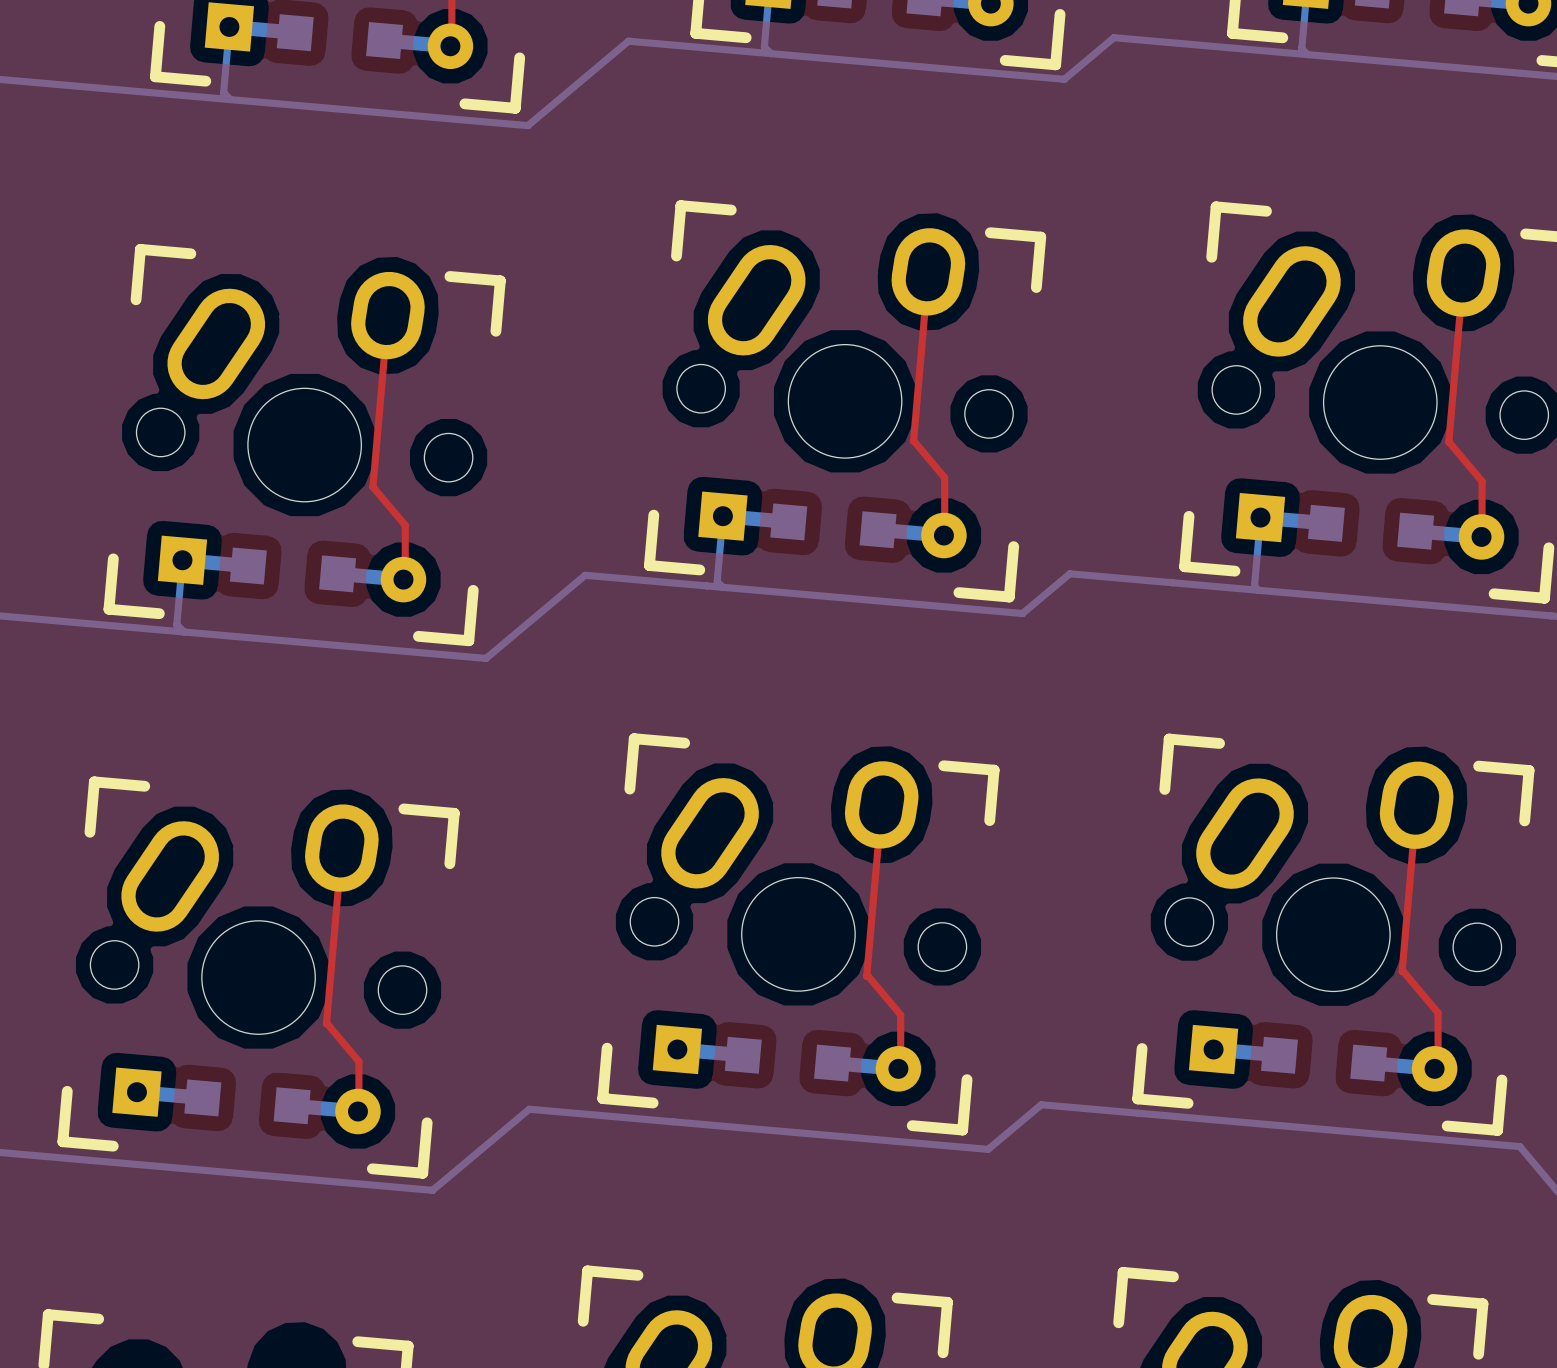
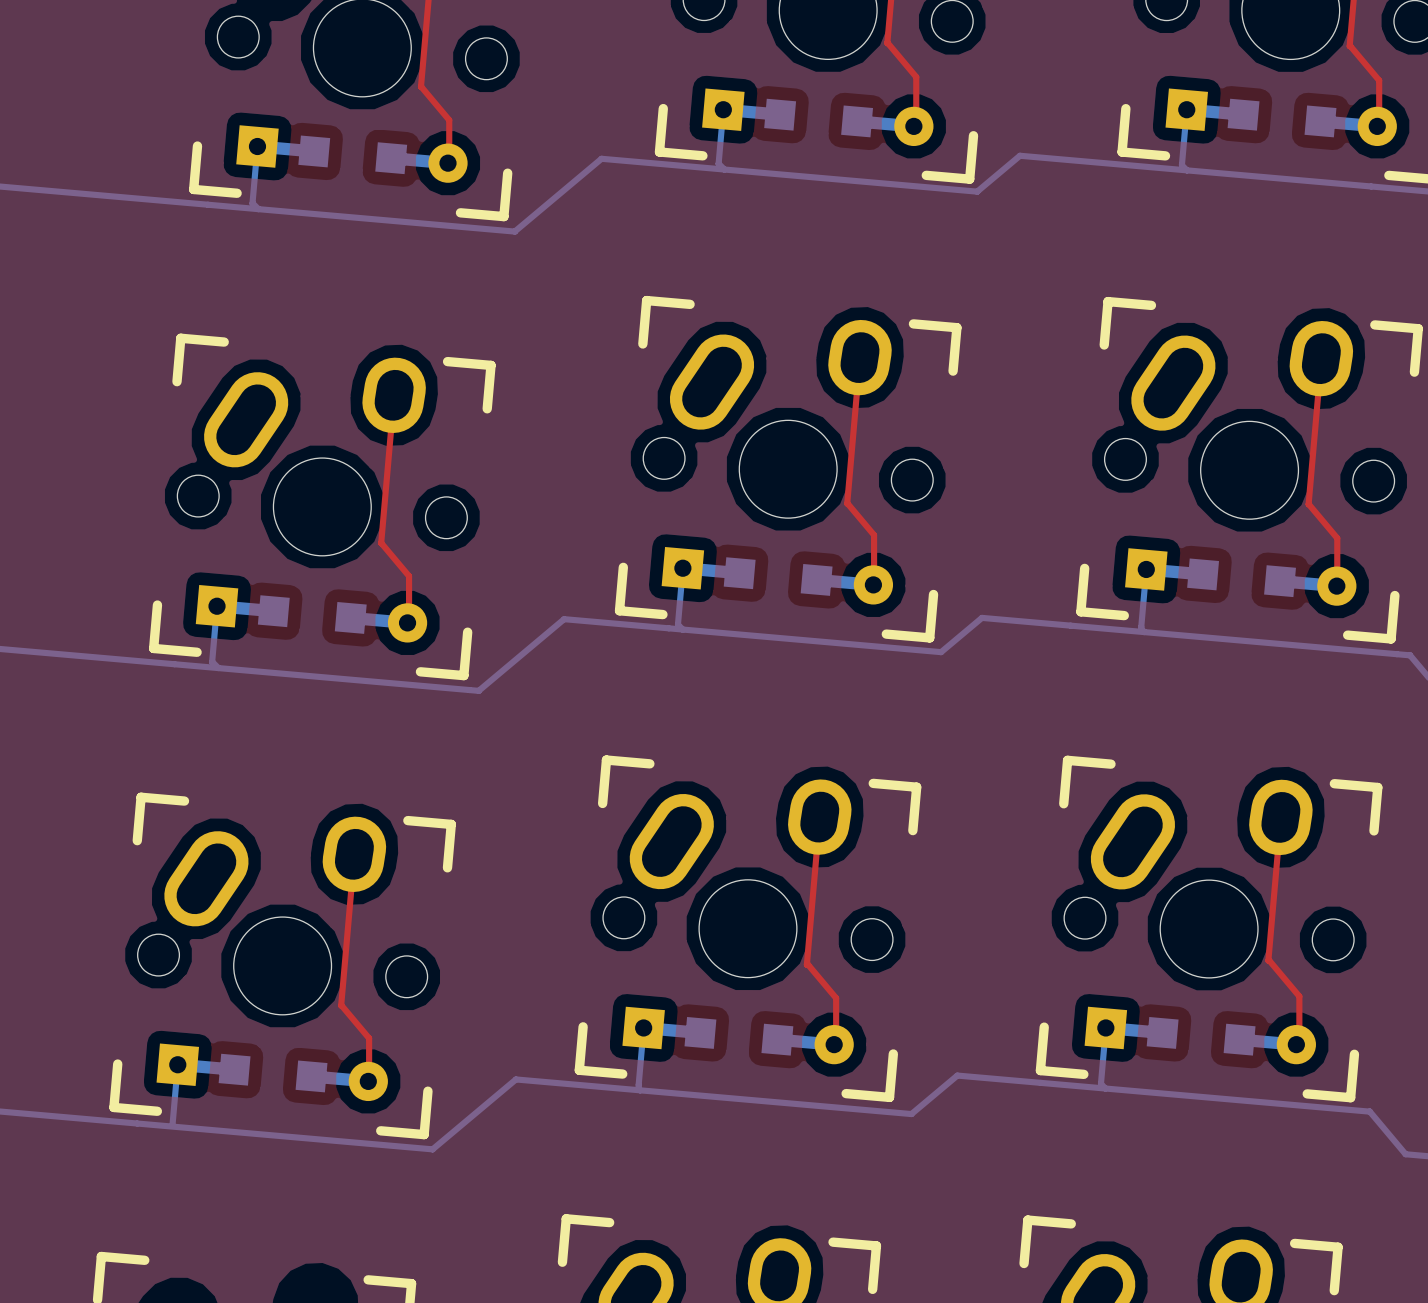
bottom track: none -> (643, 1027) (638, 1084) (640, 1090)
bottom track: none -> (1105, 1027) (1101, 1083) (1105, 1088)
bottom track: none -> (177, 1064) (172, 1122)

